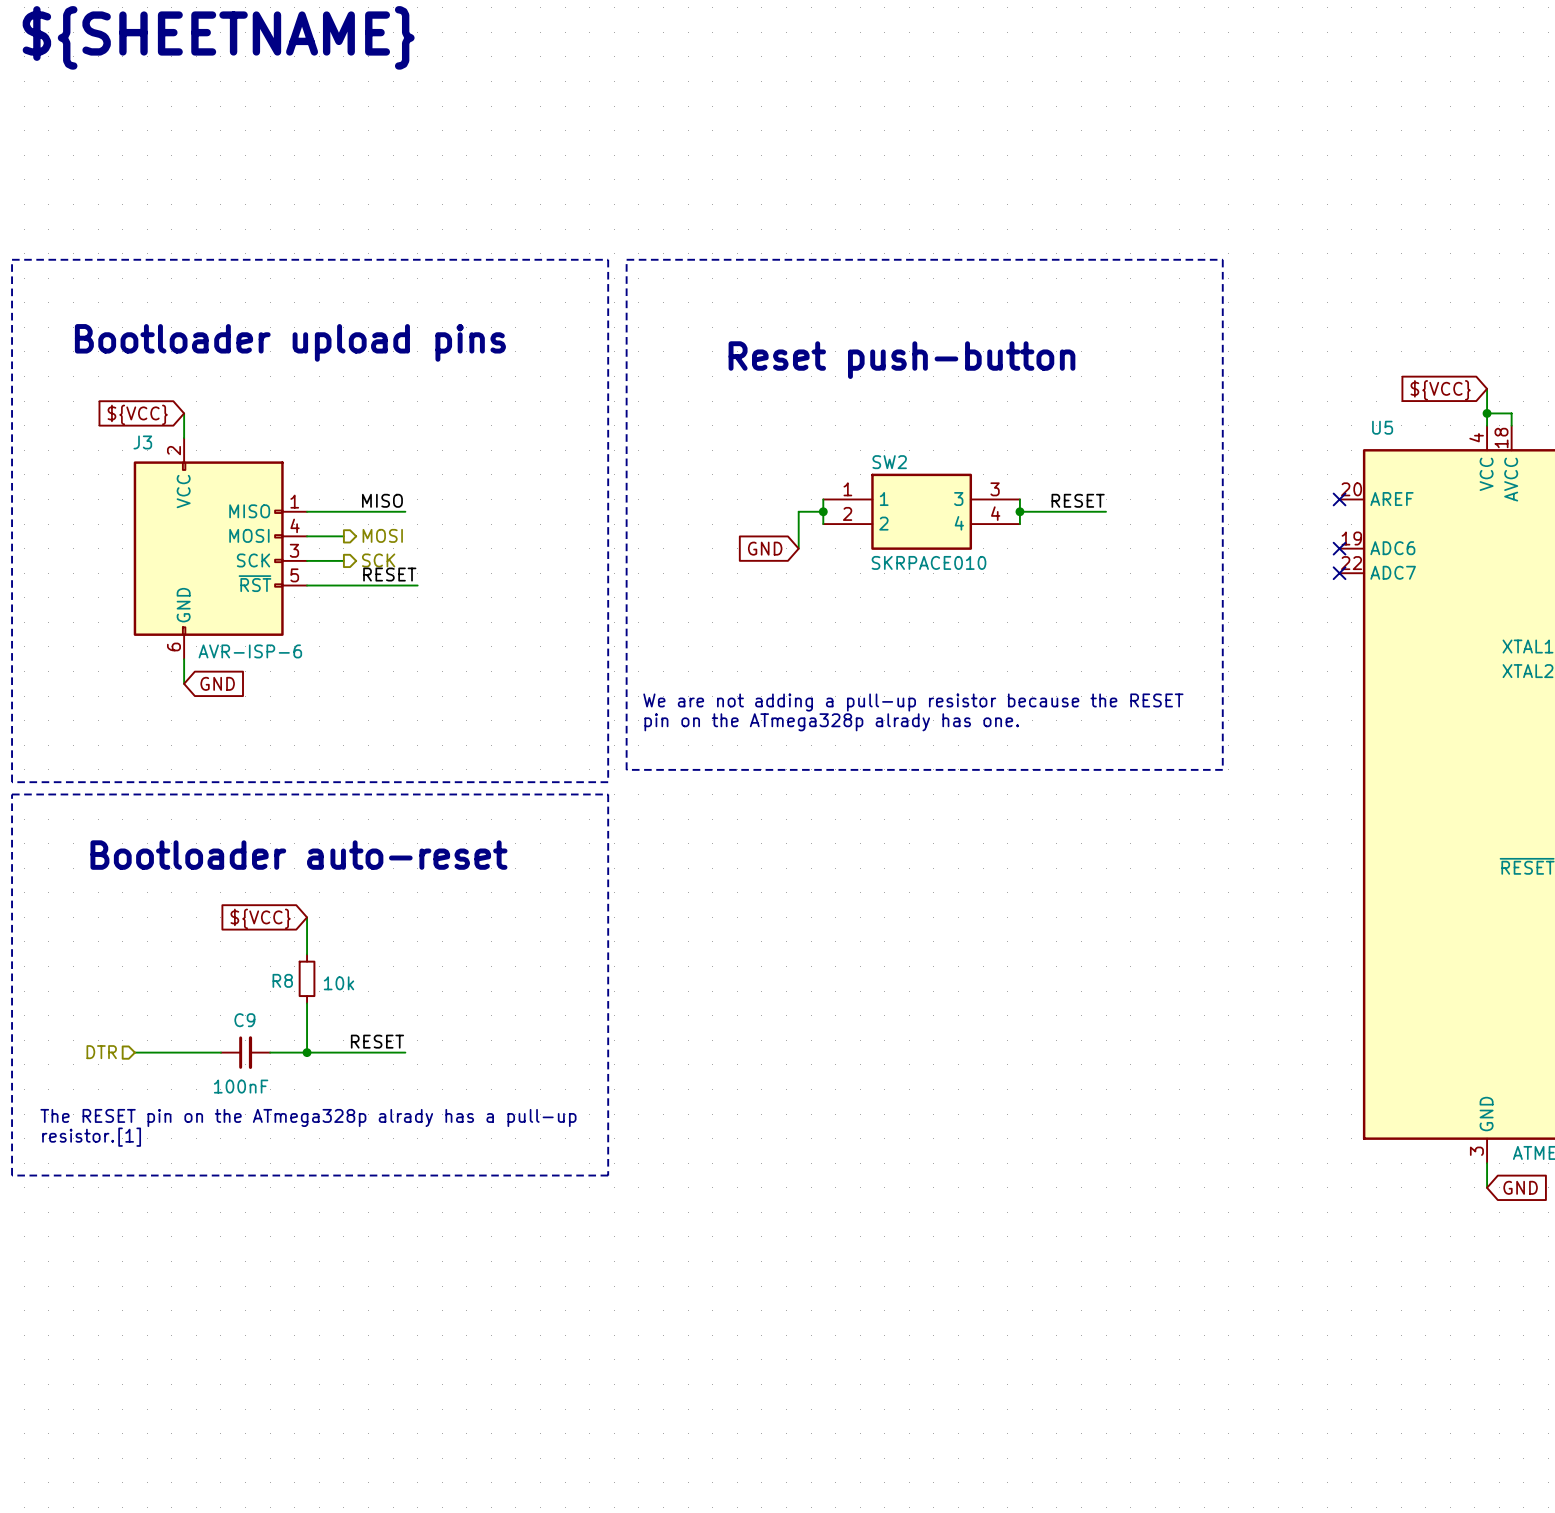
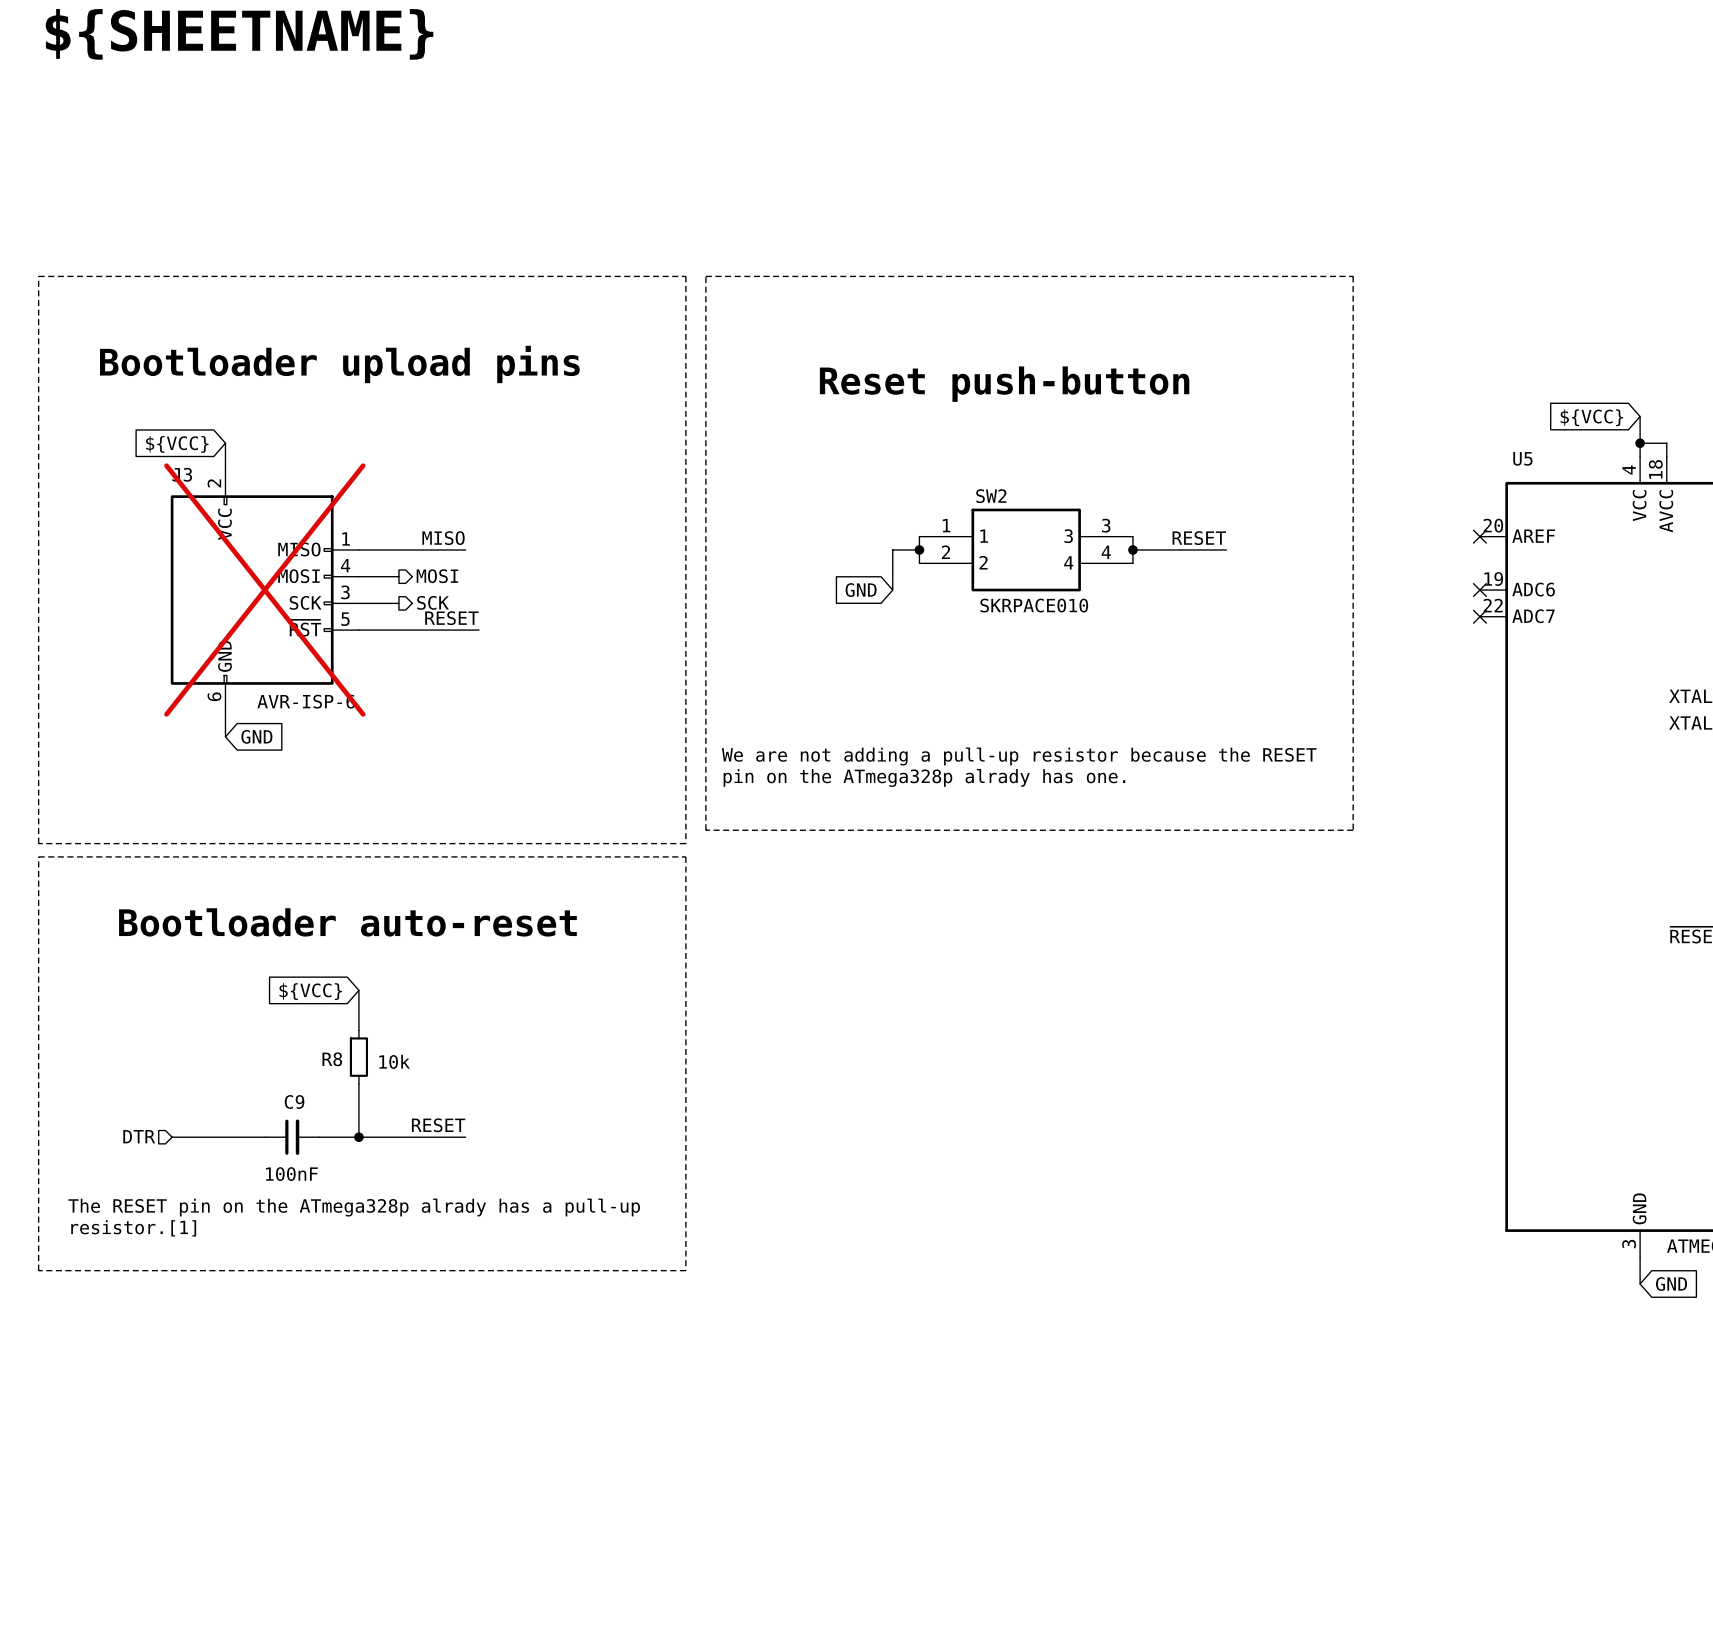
J3 do-not-place cross: none -> (264, 590)

